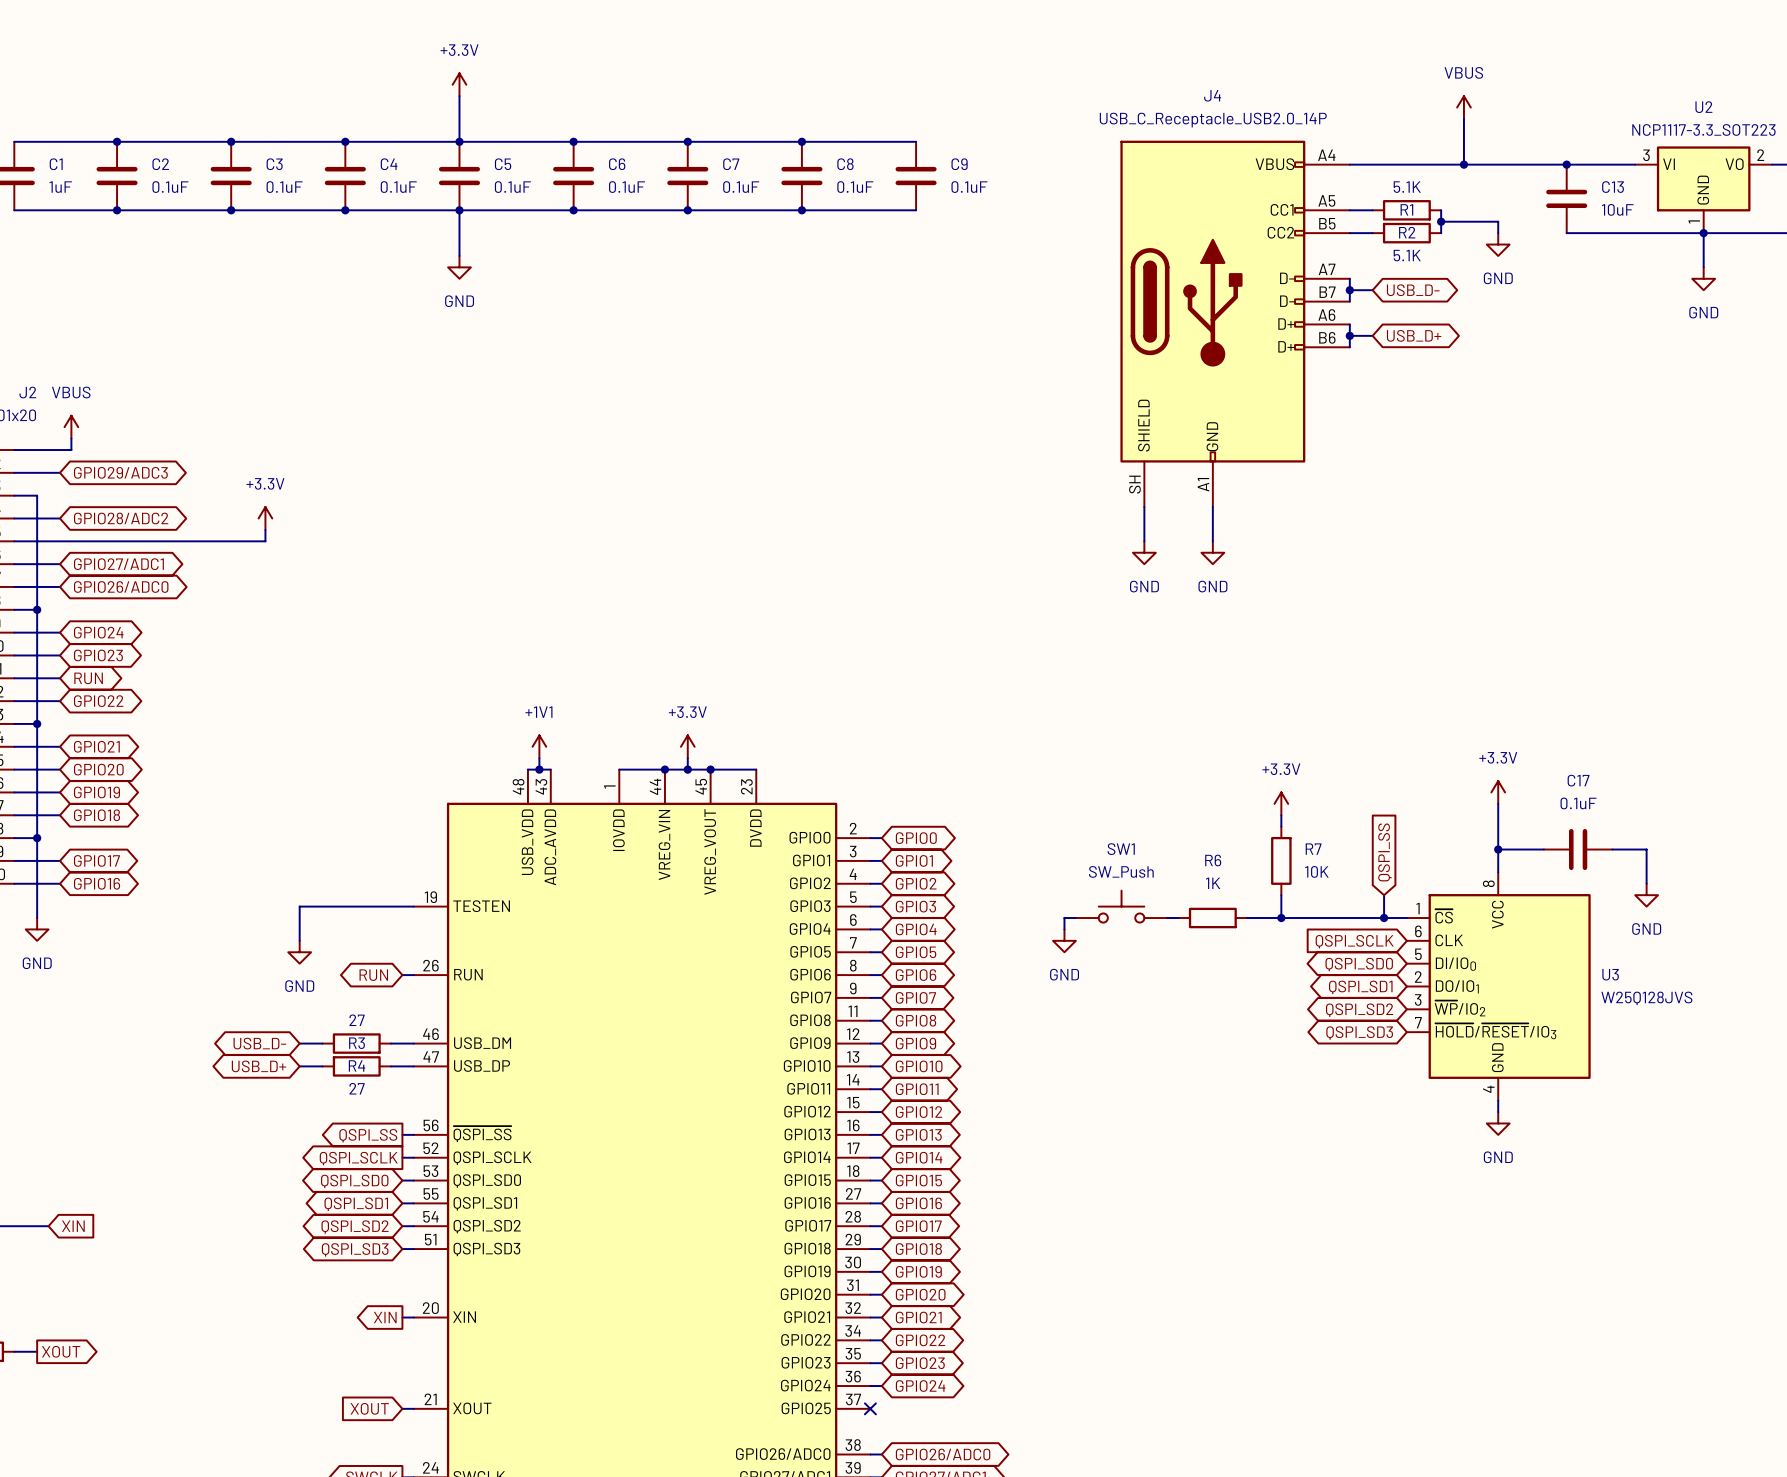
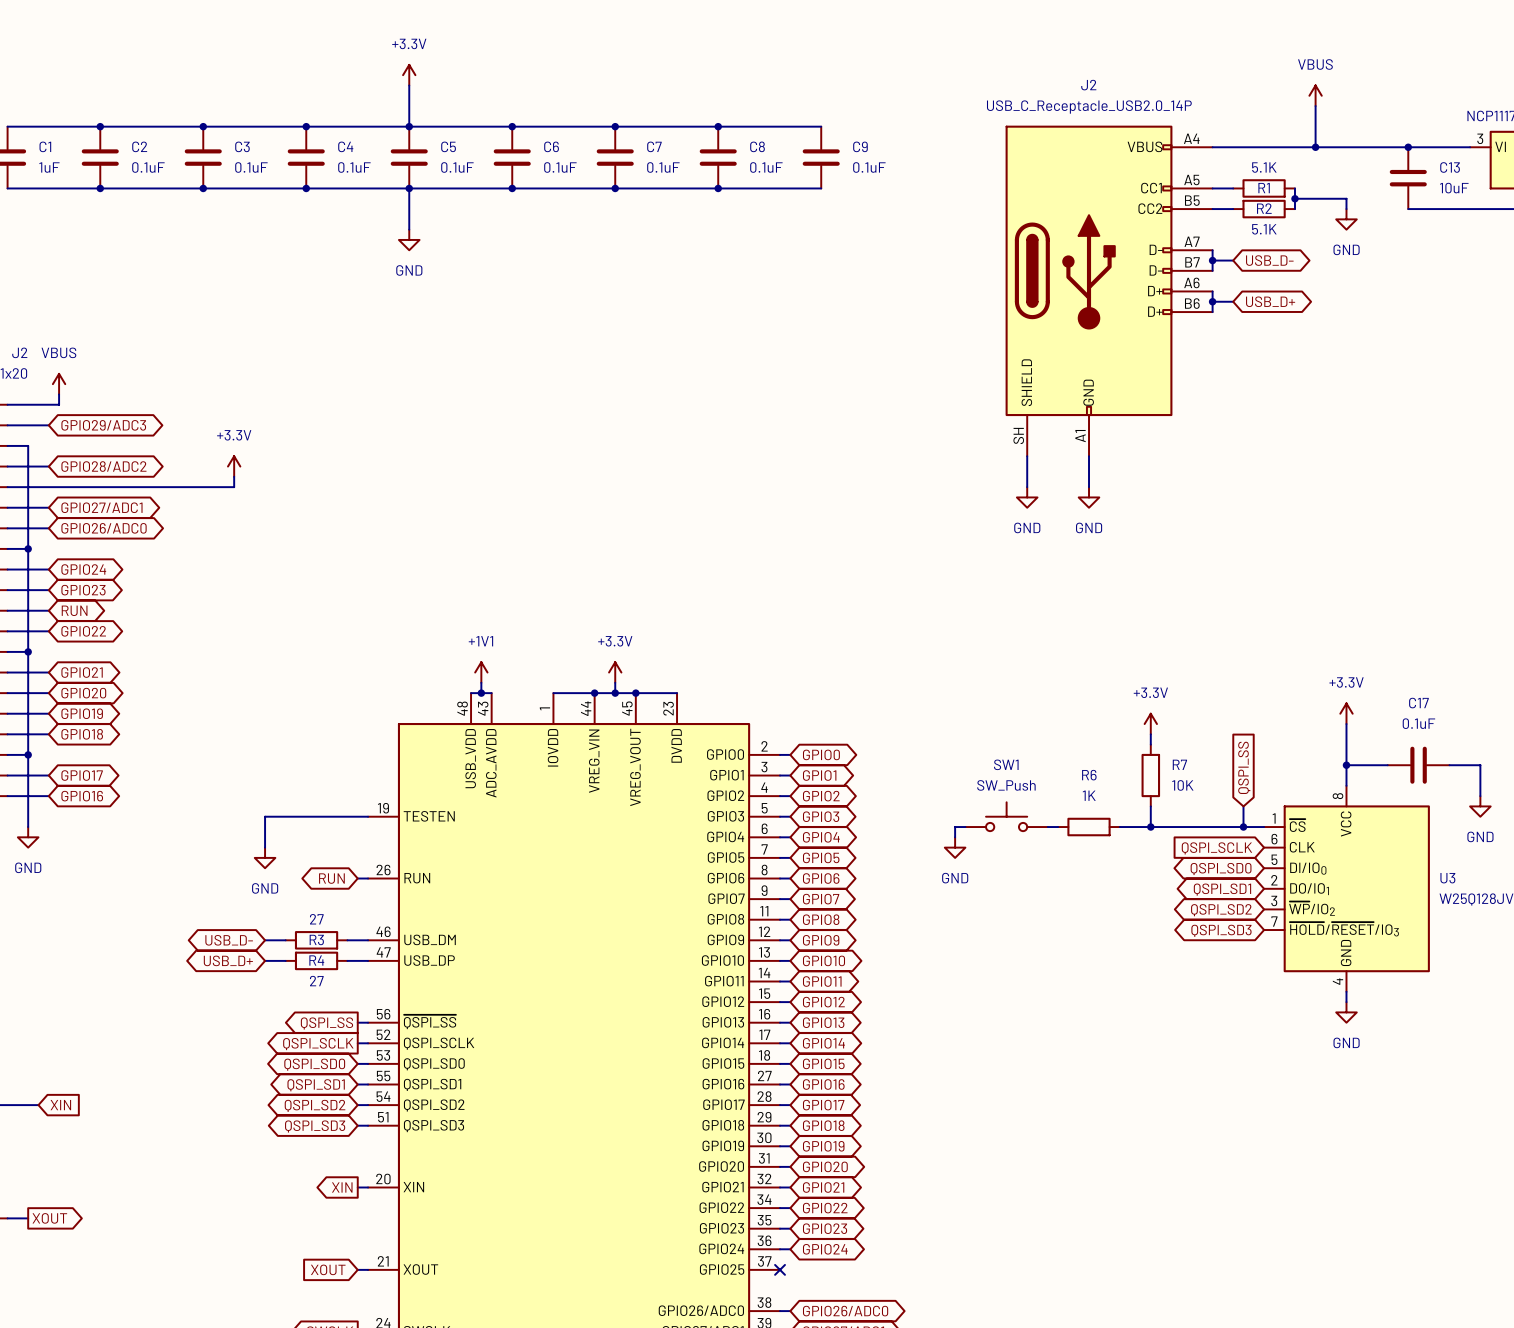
J4 name: J4 (1212, 95) -> J2 (1088, 85)

